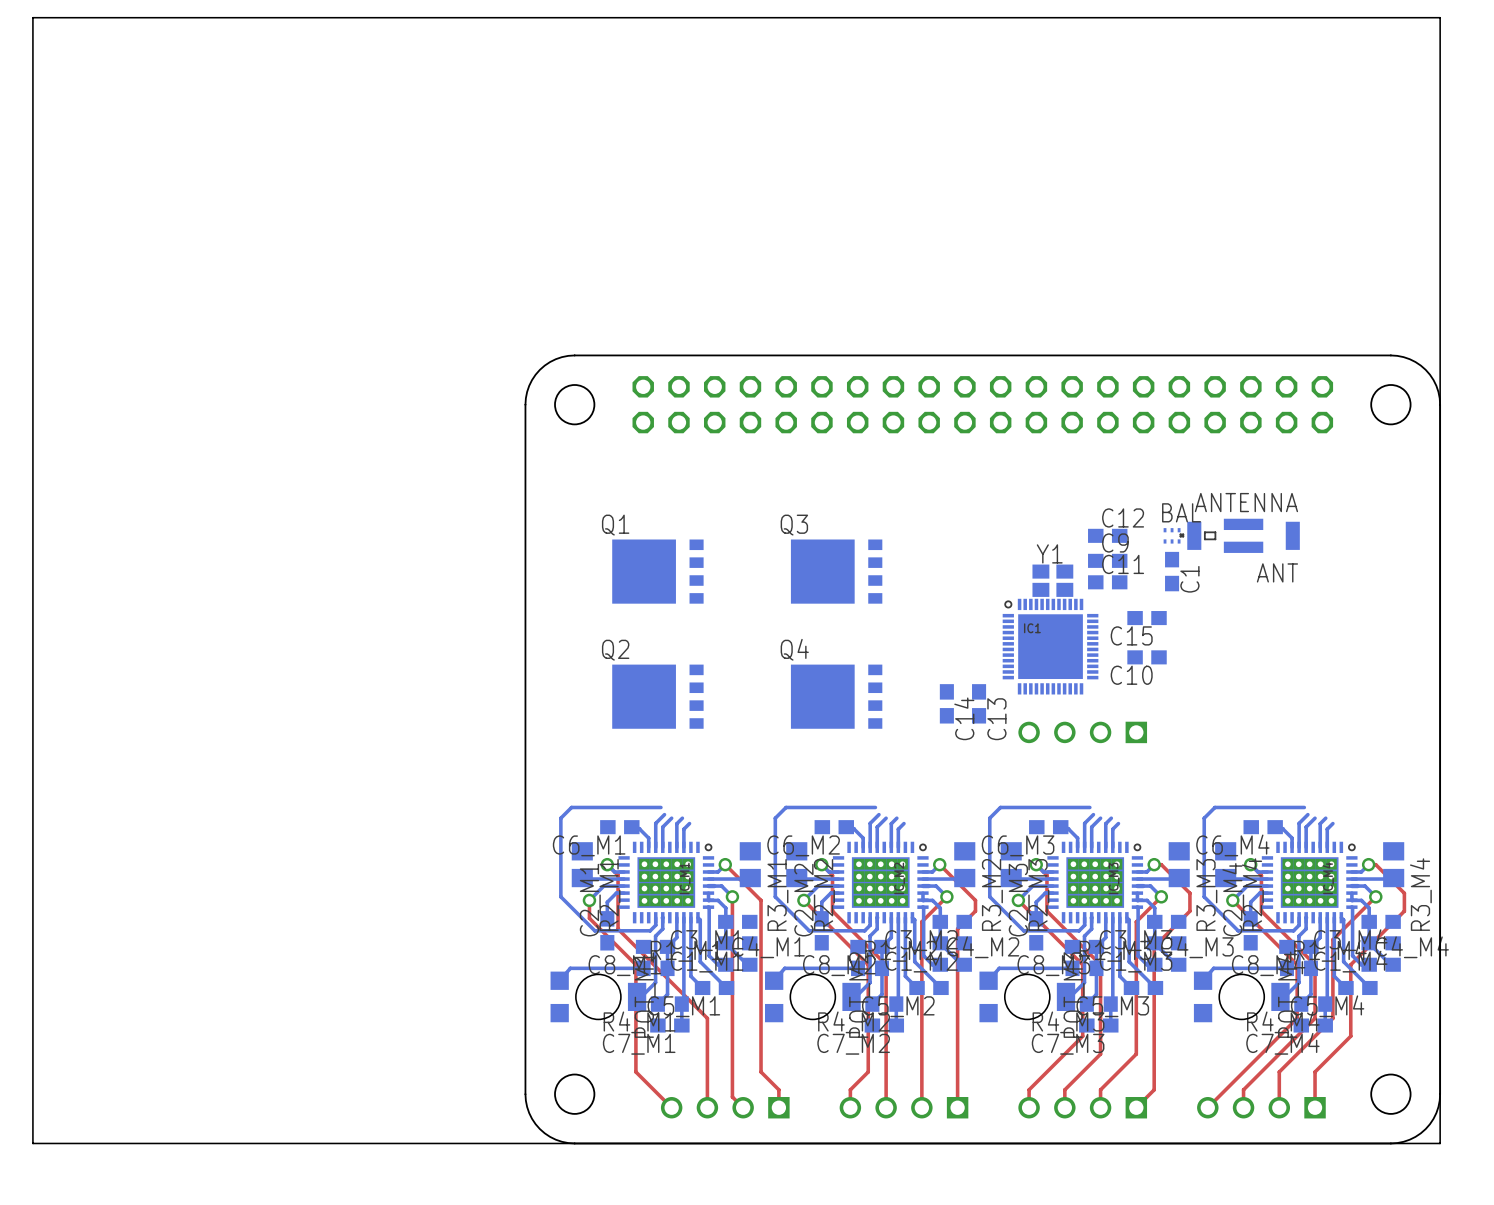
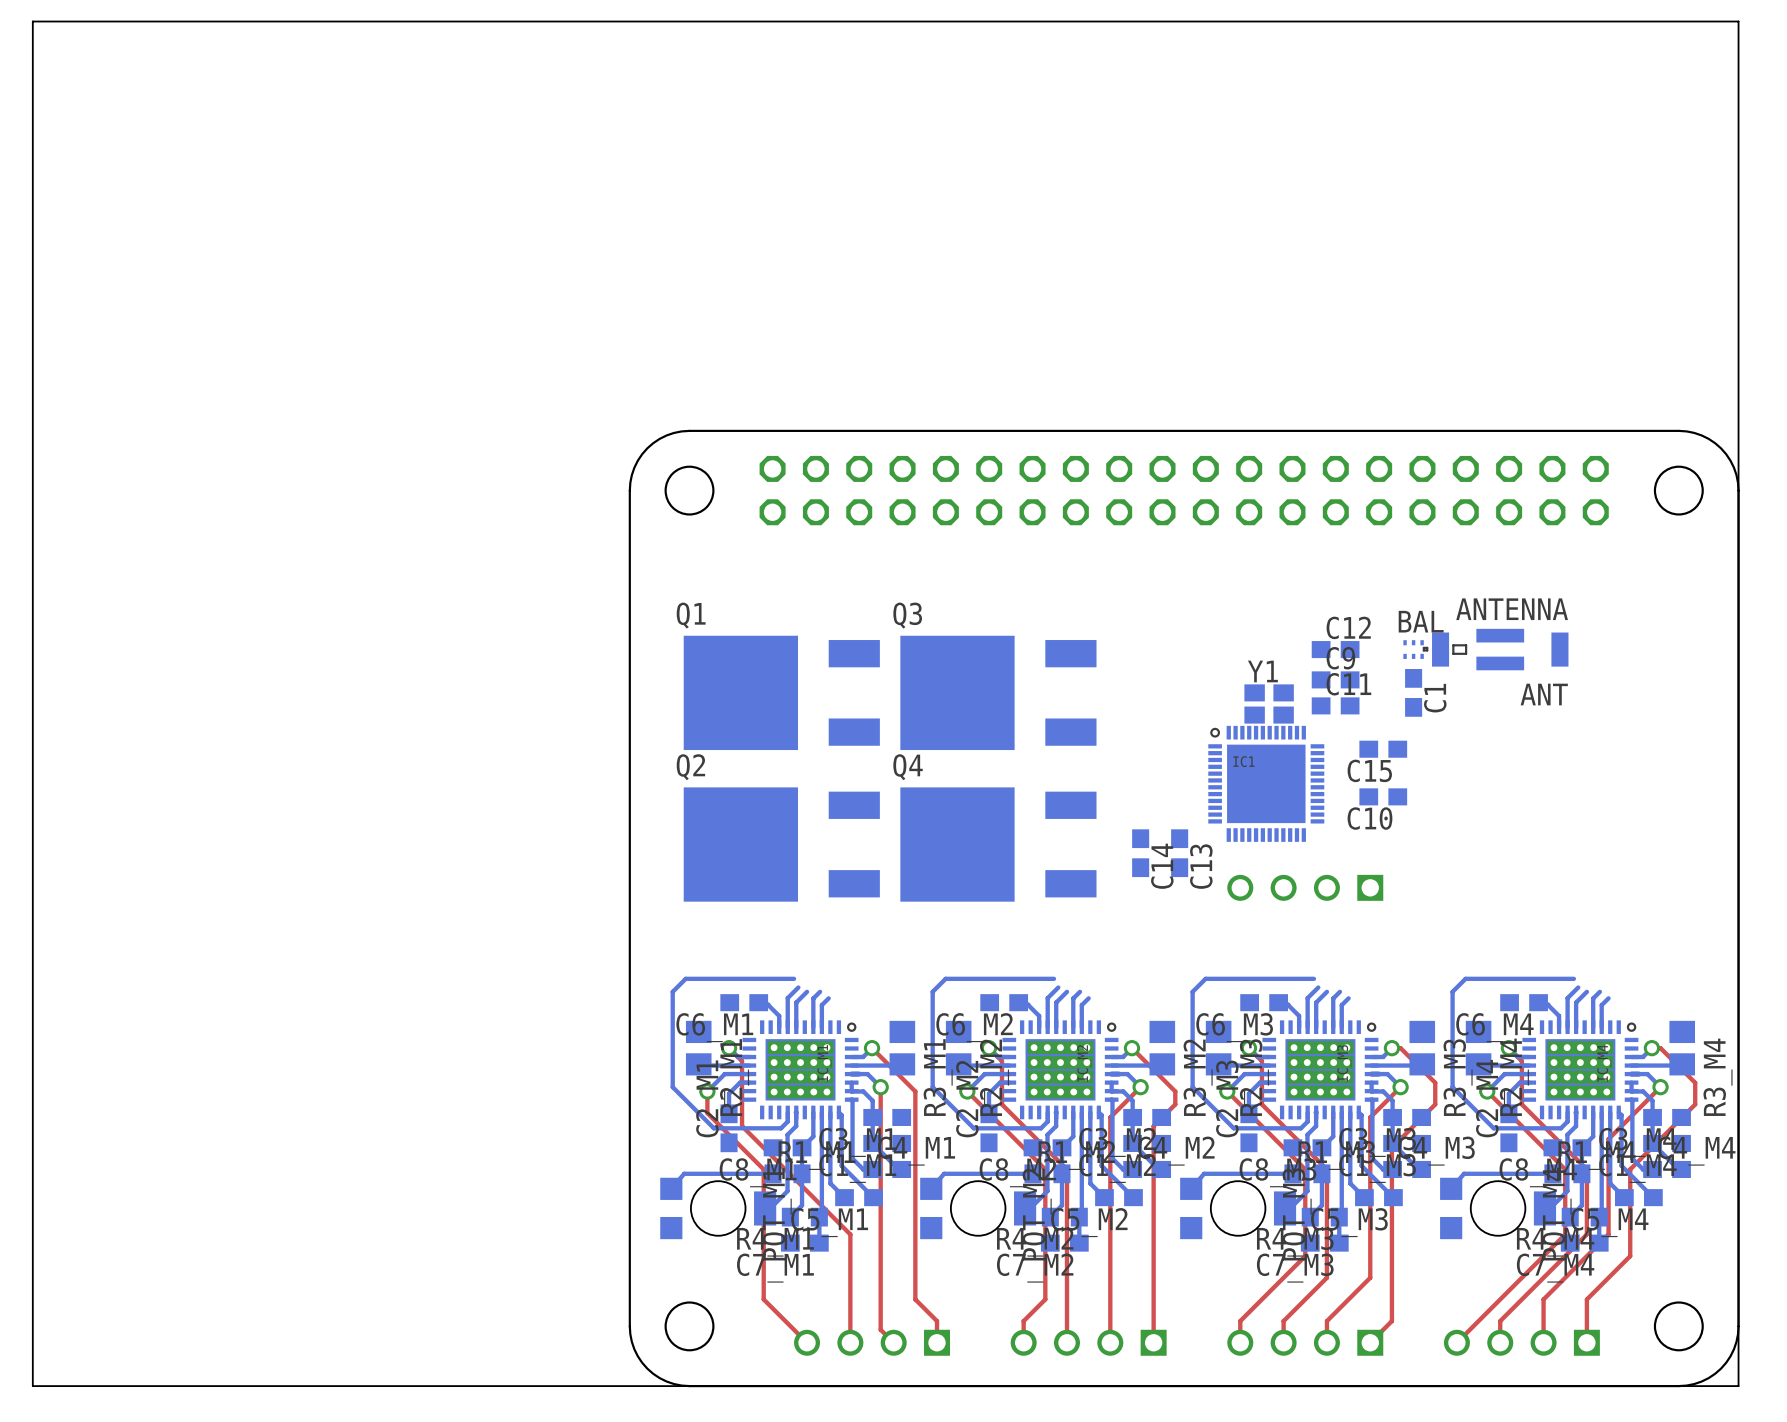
Q1 name position: Q1 (615, 525) -> Q1 (691, 615)
Q3 name position: Q3 (794, 525) -> Q3 (907, 615)
Q1 footprint: [612, 539, 704, 604] -> [683, 635, 880, 751]
Q3 footprint: [790, 539, 883, 604] -> [900, 635, 1097, 751]
Q4 name position: Q4 (794, 649) -> Q4 (908, 767)
Q2 name position: Q2 (615, 650) -> Q2 (690, 767)
Q2 footprint: [612, 664, 704, 729] -> [683, 787, 880, 902]
Q4 footprint: [790, 664, 883, 729] -> [900, 787, 1097, 902]

